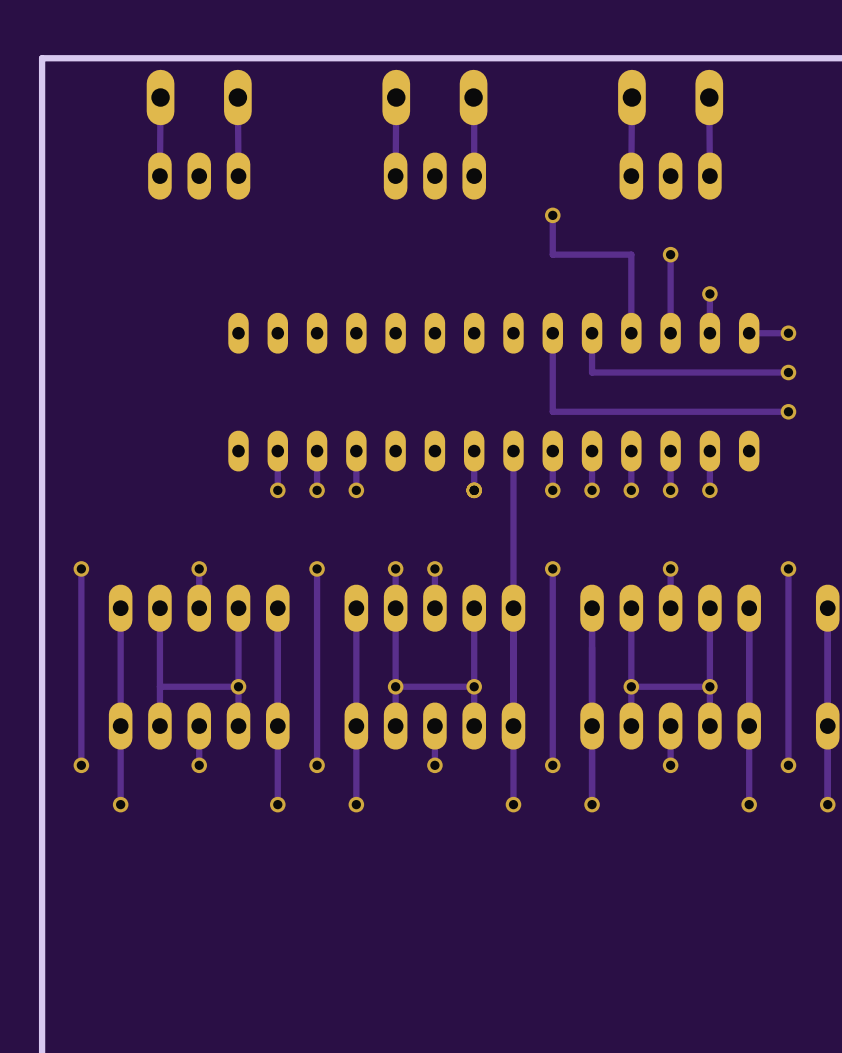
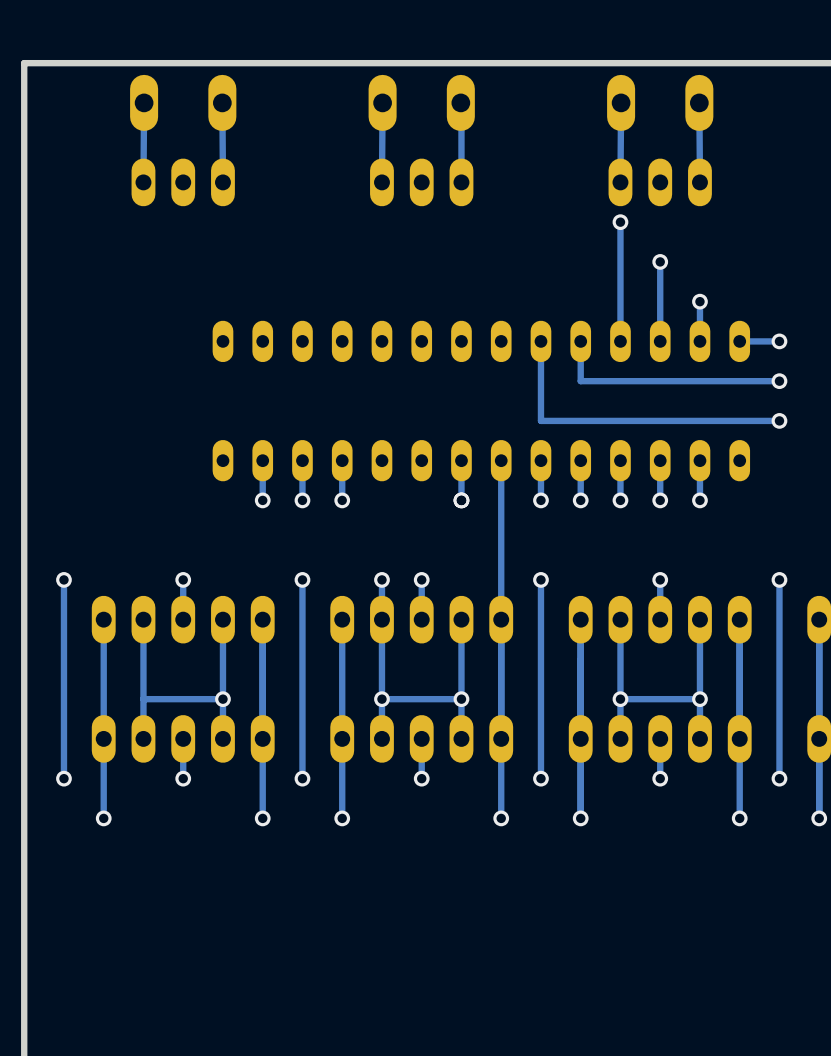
track: (552, 215) (552, 254) (631, 254) -> (620, 222) (620, 261)
via position: (552, 215) -> (620, 222)

